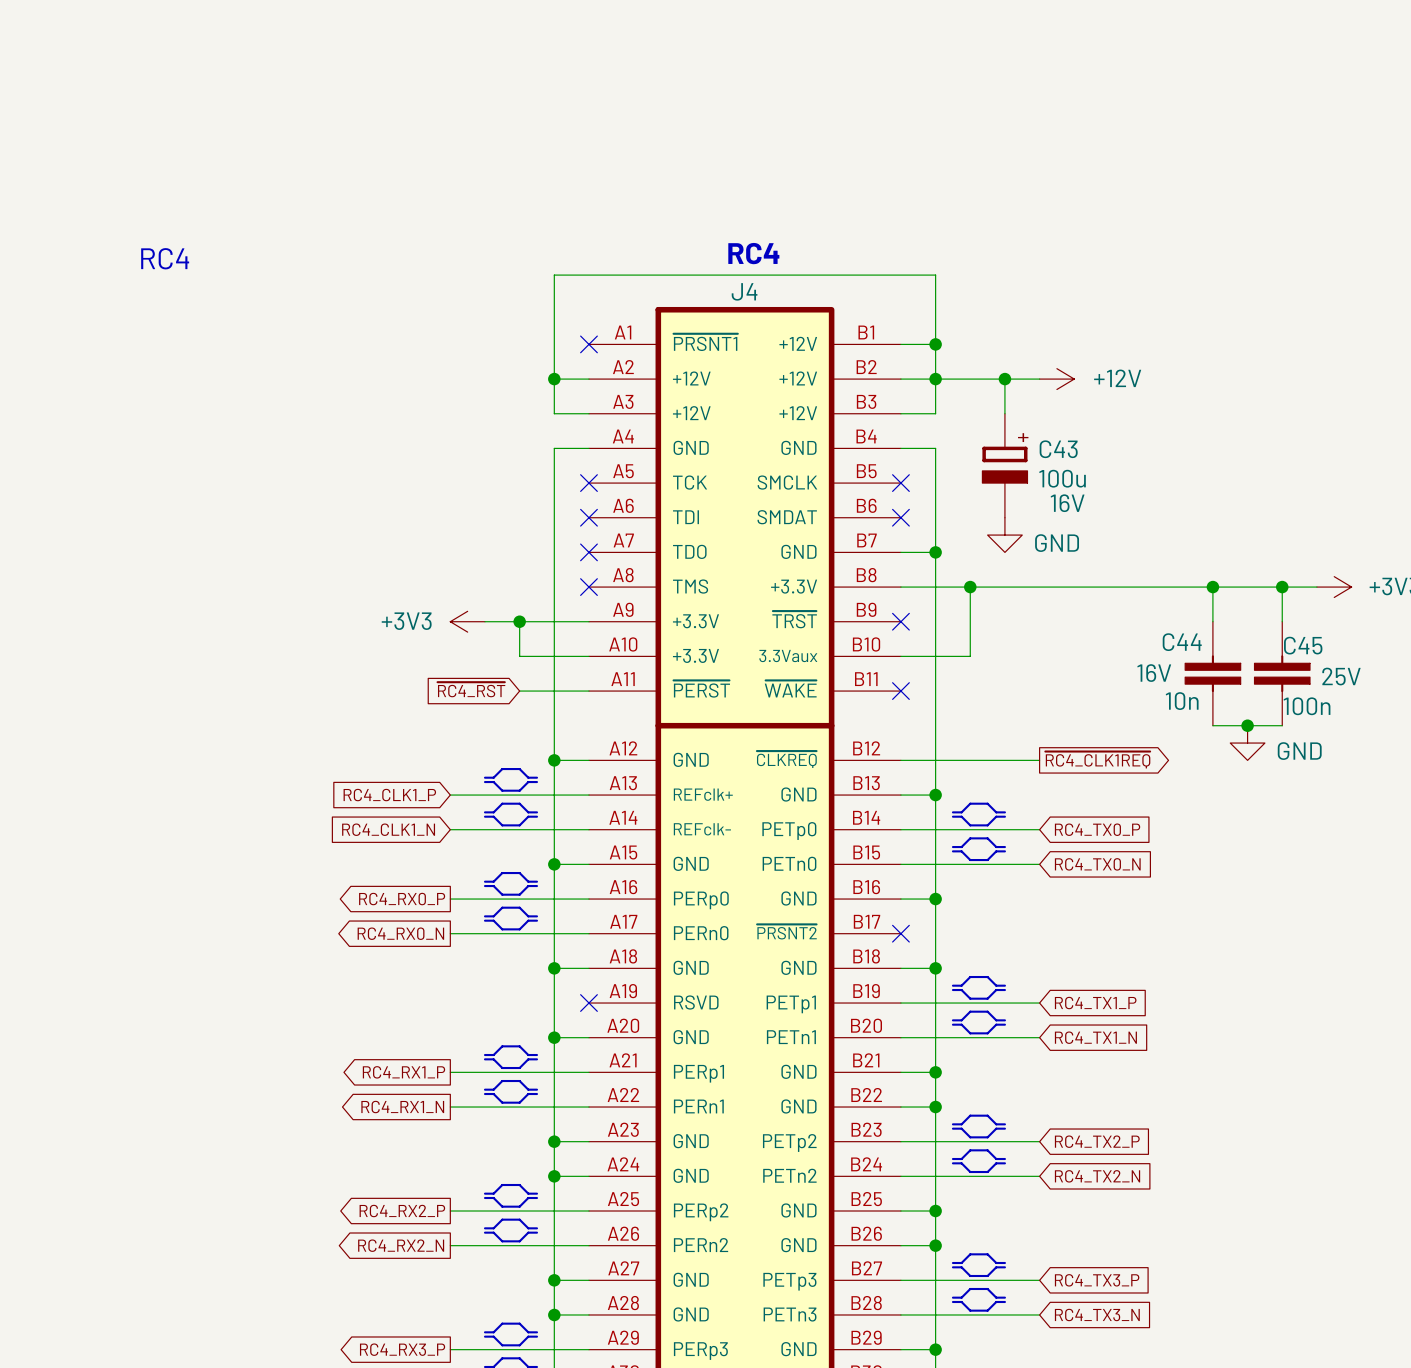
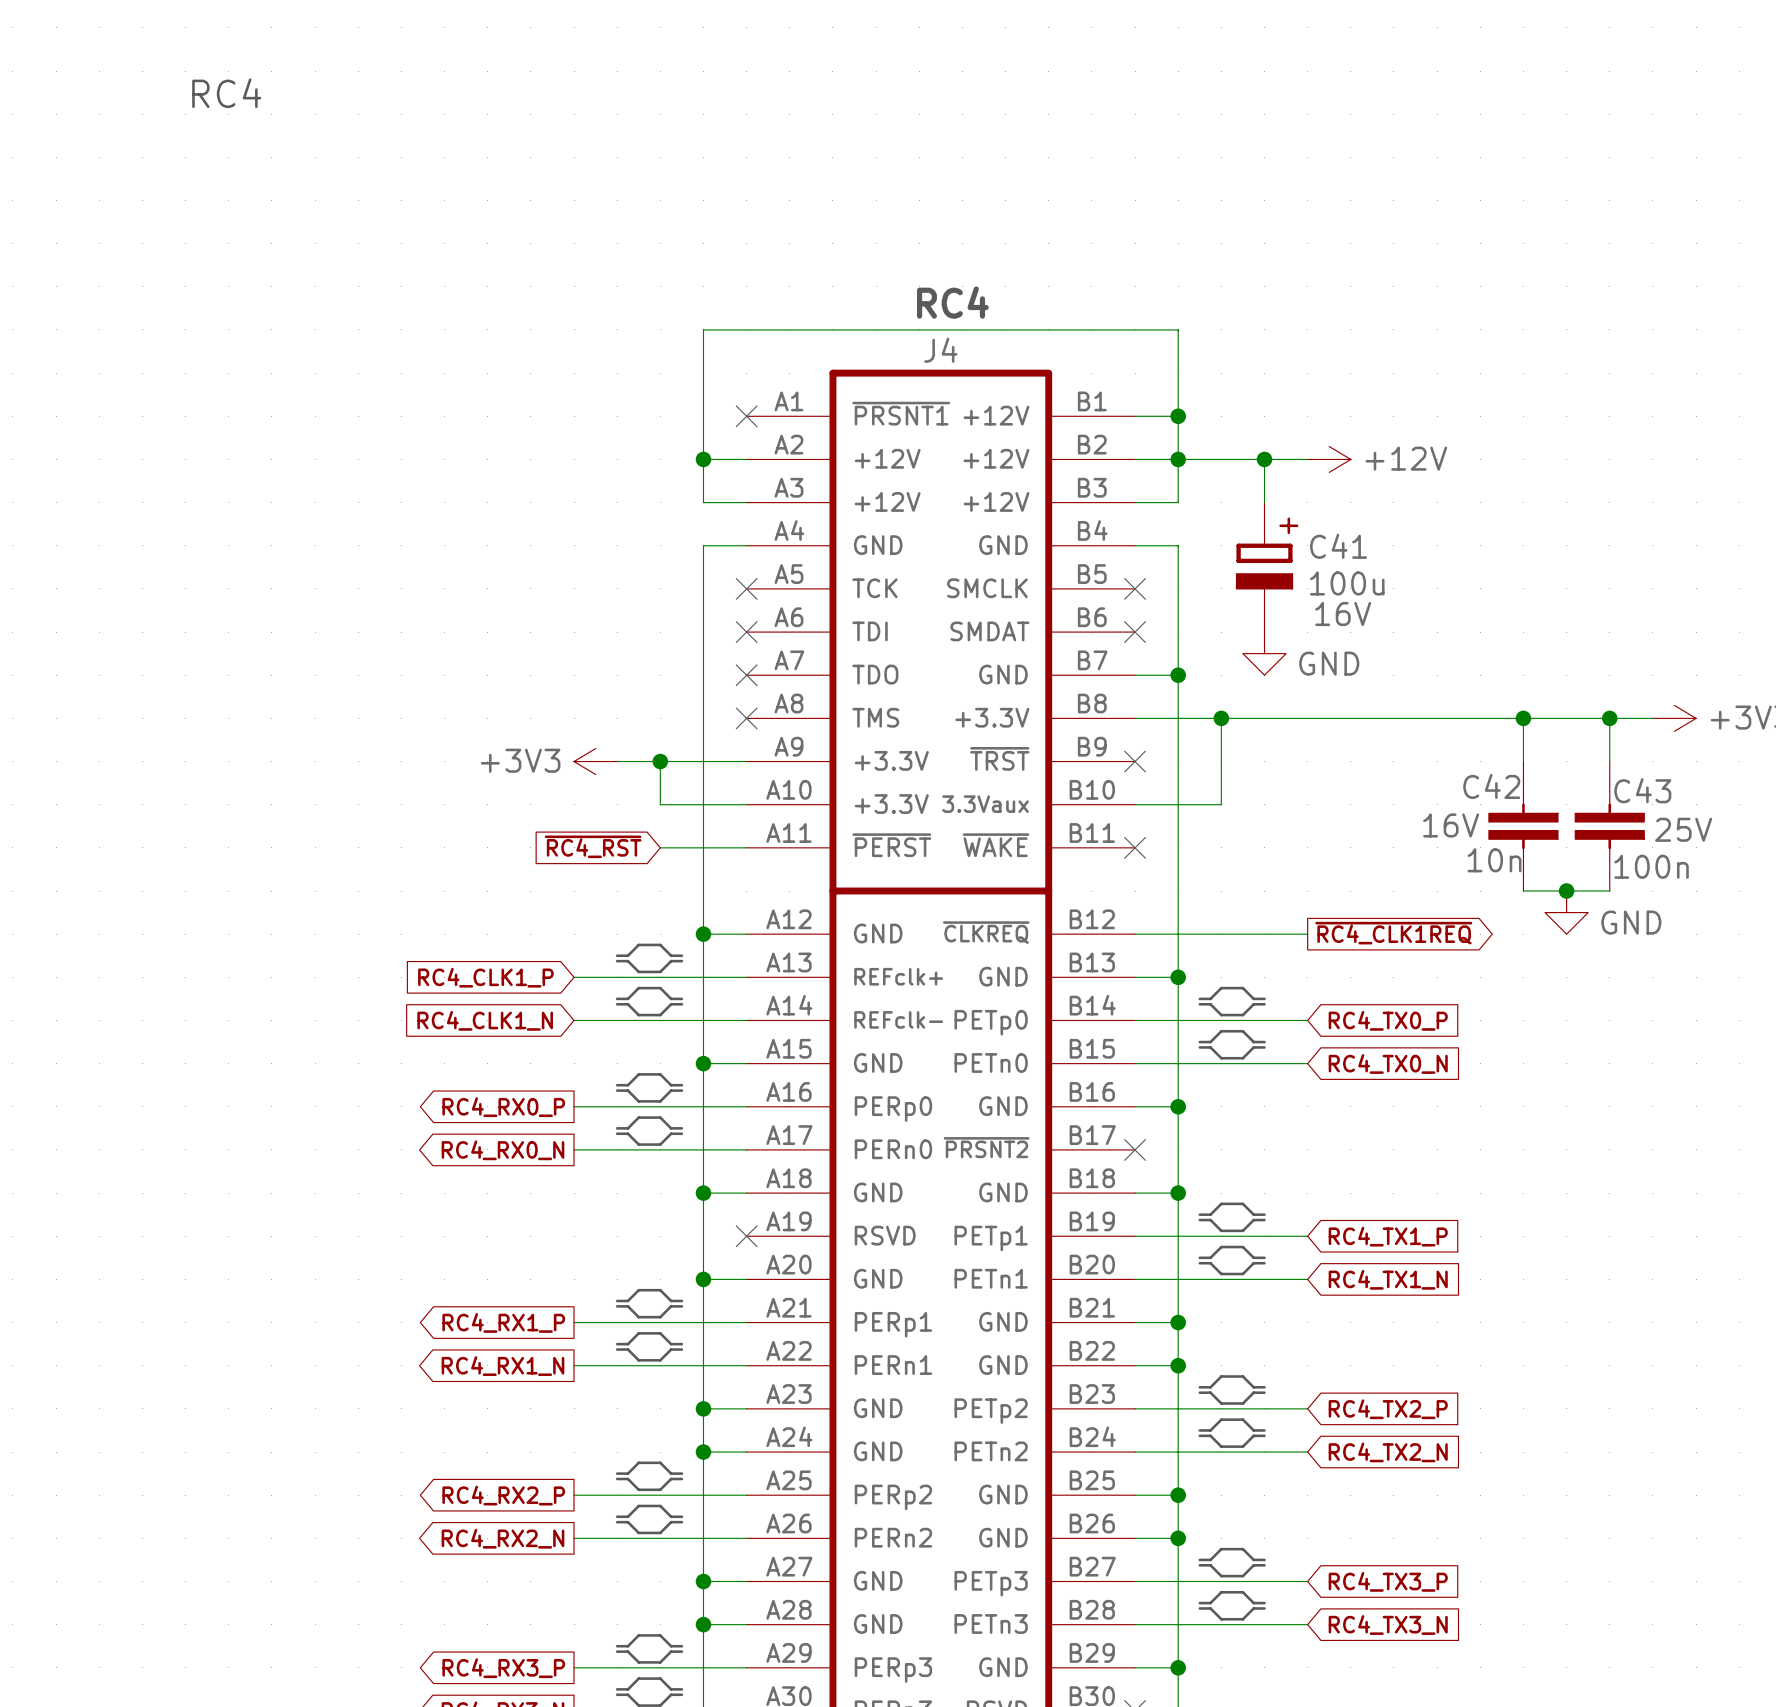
text position: RC4 (165, 258) -> RC4 (226, 93)
C43 name: C43 (1058, 449) -> C41 (1338, 546)
C44 name: C44 (1182, 642) -> C42 (1491, 786)
C45 name: C45 (1303, 645) -> C43 (1642, 790)

